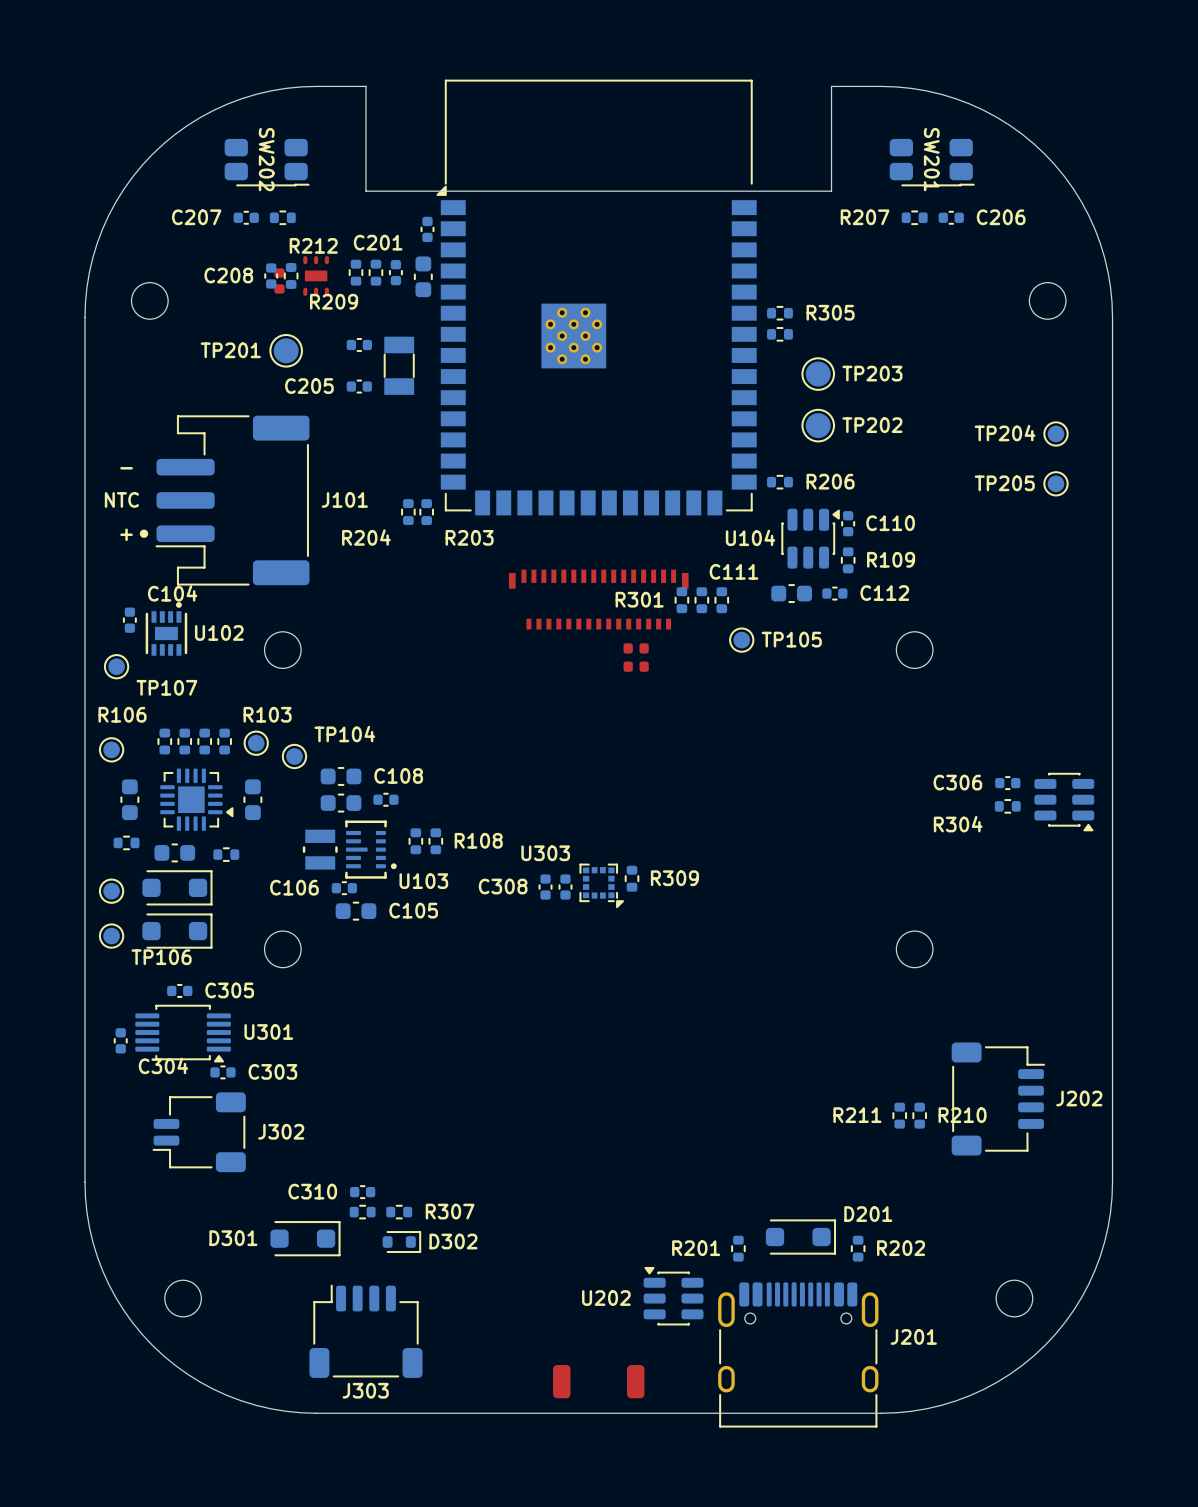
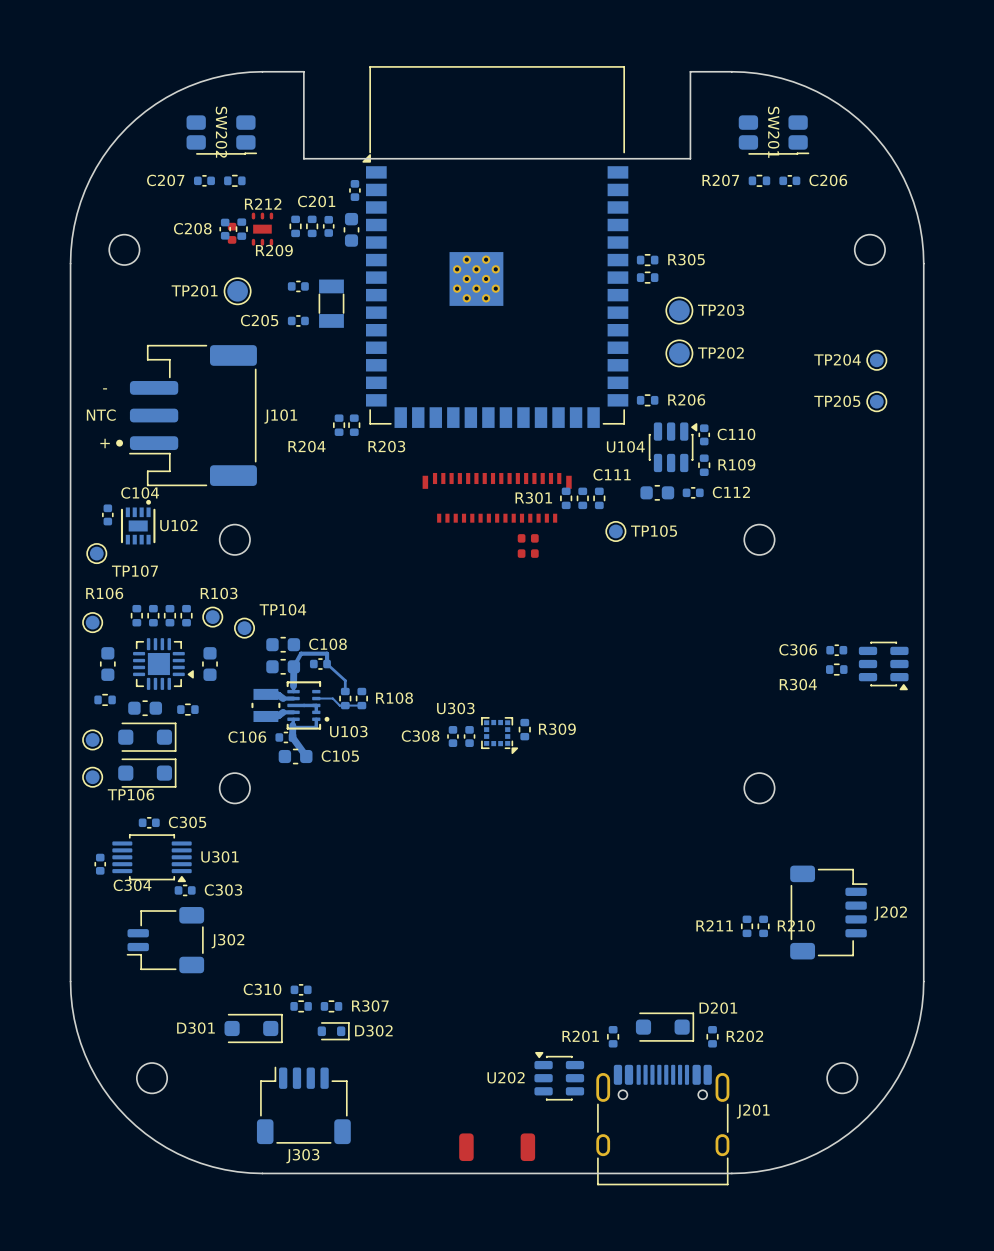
bottom track: none -> (345, 691) (345, 680) (327, 664) (327, 653) (301, 653) (293, 666) (293, 691)
bottom track: none -> (269, 695) (293, 698)
bottom track: none -> (316, 698) (332, 698) (339, 705) (361, 705)
bottom track: none -> (303, 705) (316, 705) (316, 712)
bottom track: none -> (293, 712) (269, 715)
bottom track: none -> (293, 719) (292, 737) (306, 756)
bottom track: none -> (316, 719) (316, 727) (292, 727)

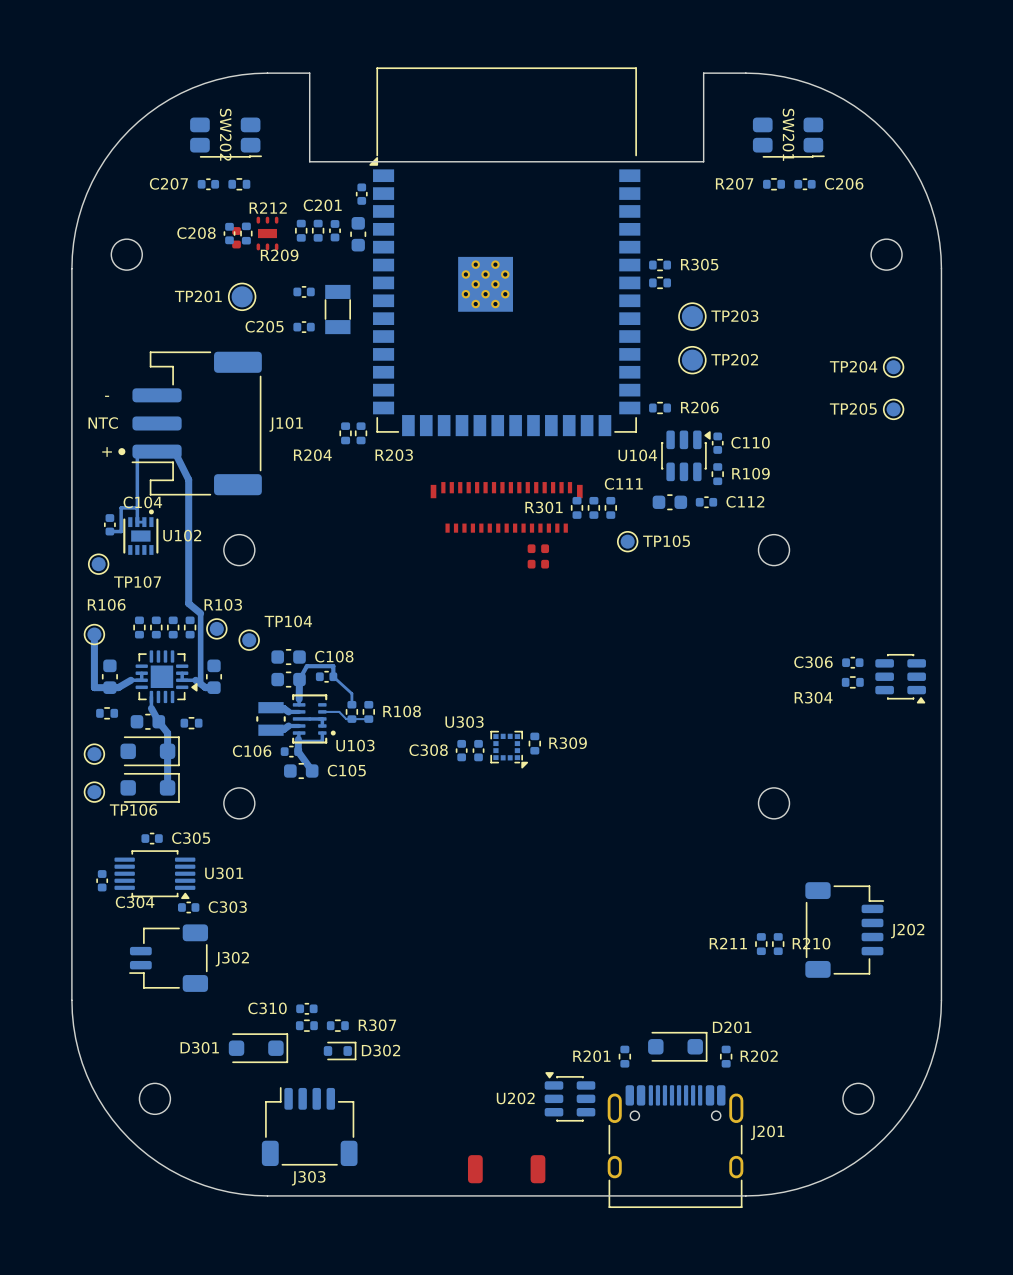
bottom track: none -> (137, 451) (137, 522) (144, 522)
bottom track: none -> (174, 451) (188, 479) (188, 603) (200, 613) (200, 683)
bottom track: none -> (137, 507) (121, 507) (121, 531) (109, 531)
bottom track: none -> (94, 634) (94, 687) (118, 687) (131, 680) (141, 680) (141, 673)
bottom track: none -> (182, 673) (182, 680) (195, 680) (205, 687) (214, 687)
bottom track: none -> (151, 696) (151, 708) (167, 733) (167, 787)

